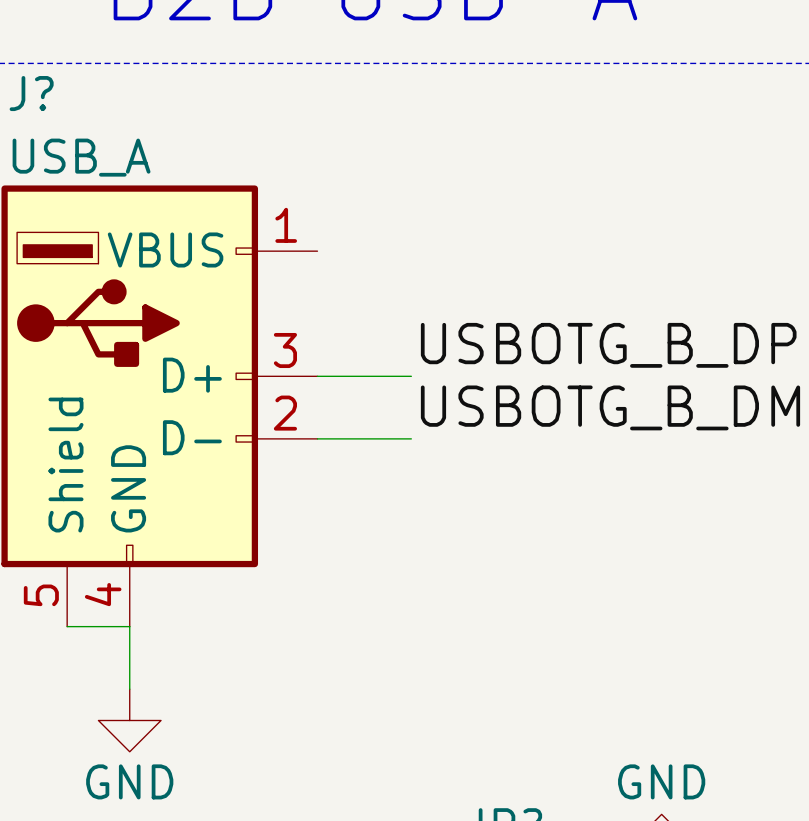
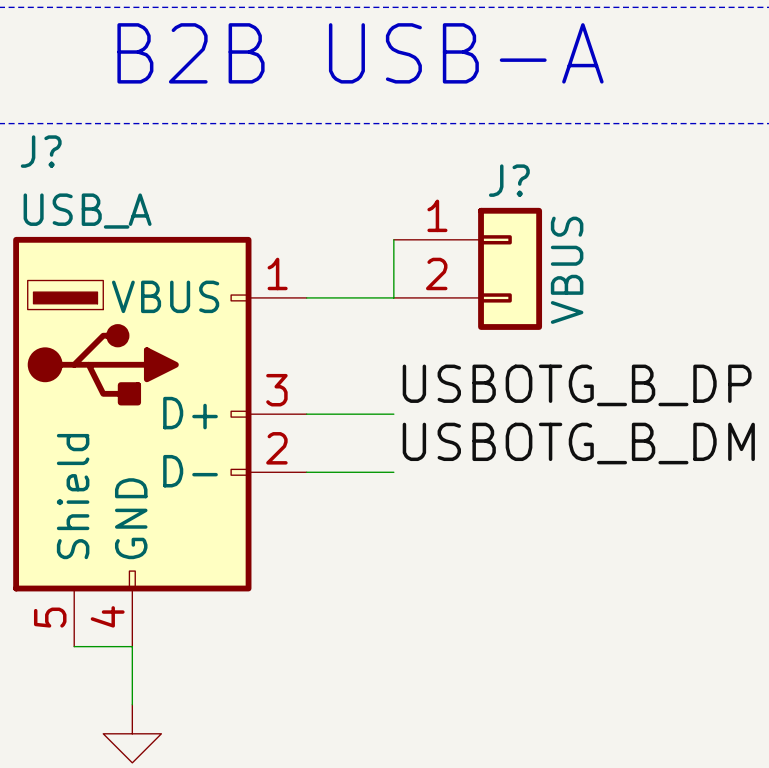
wire: none -> (393, 239) (393, 297) (306, 297)
J?: none -> VBUS (467, 268)

